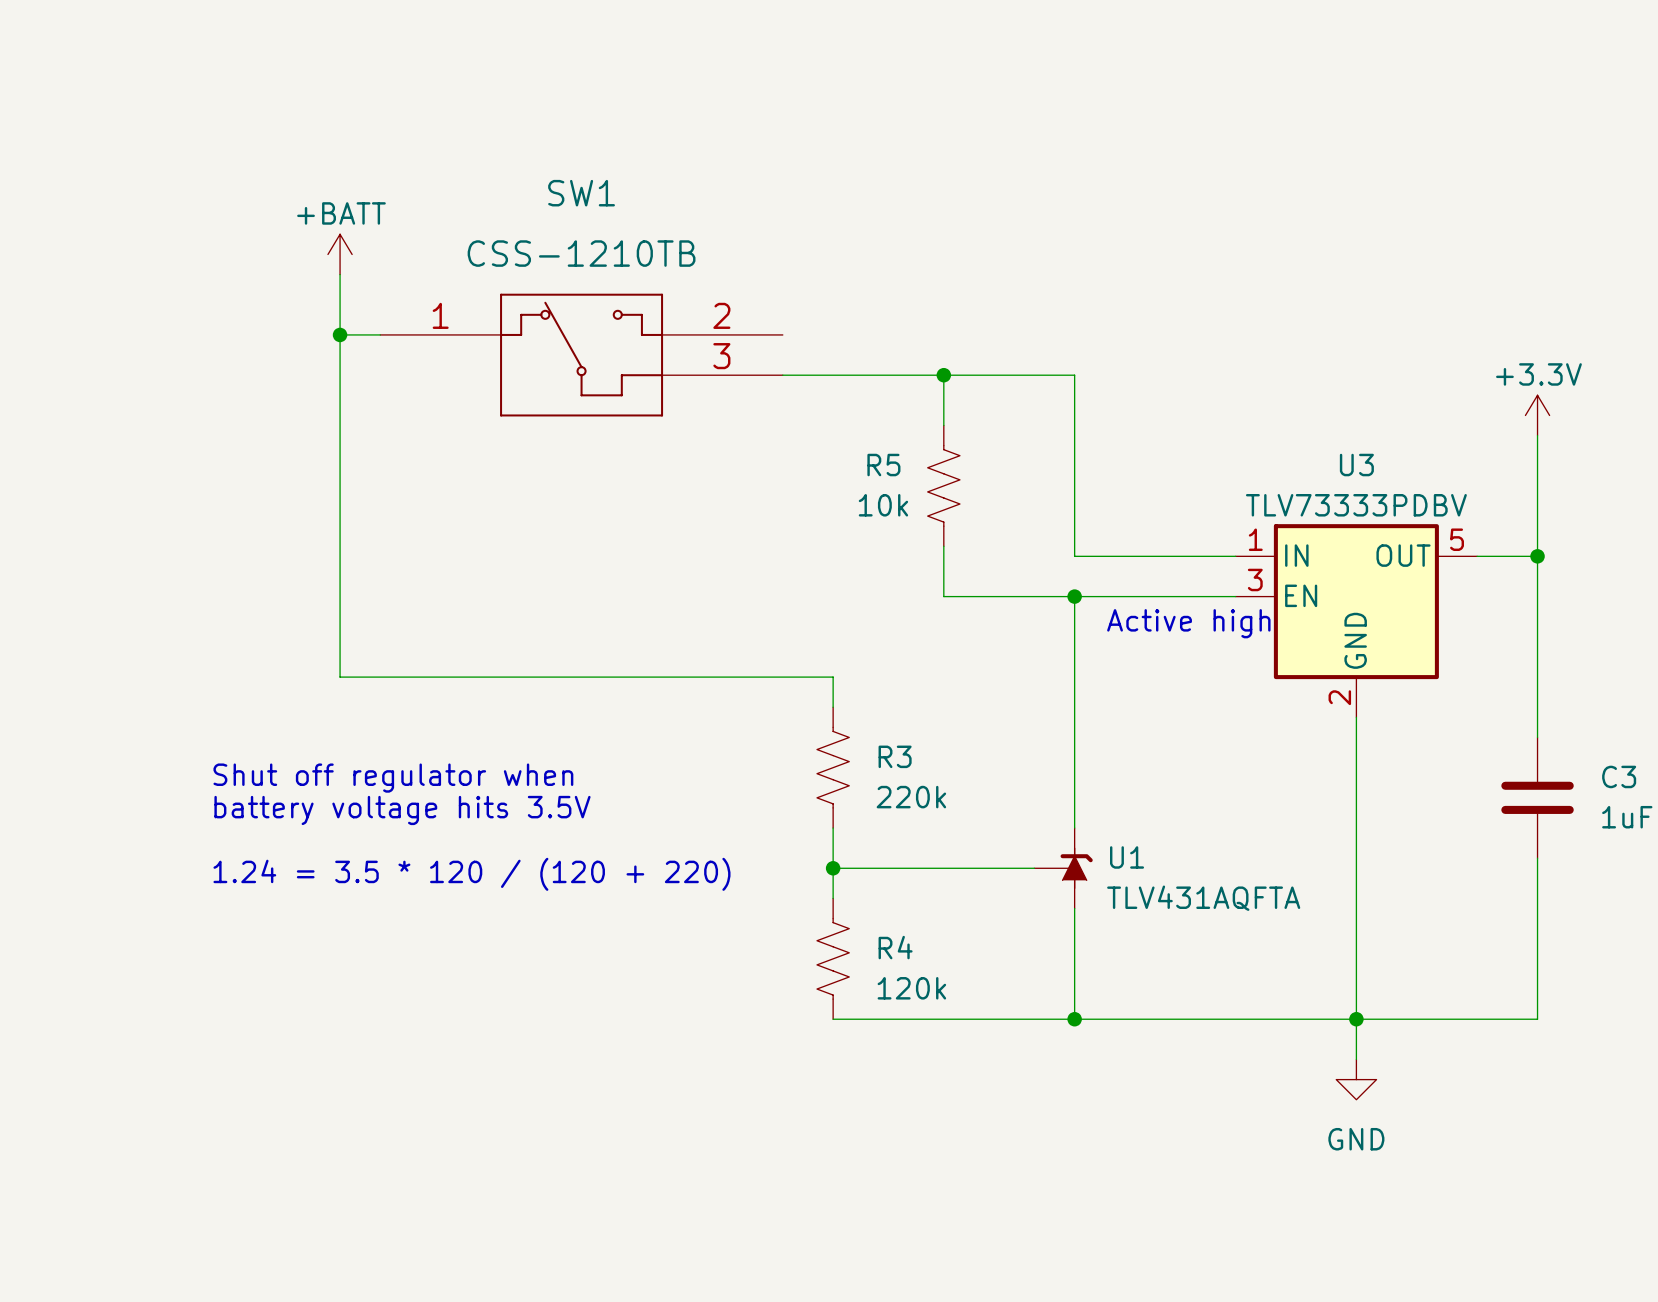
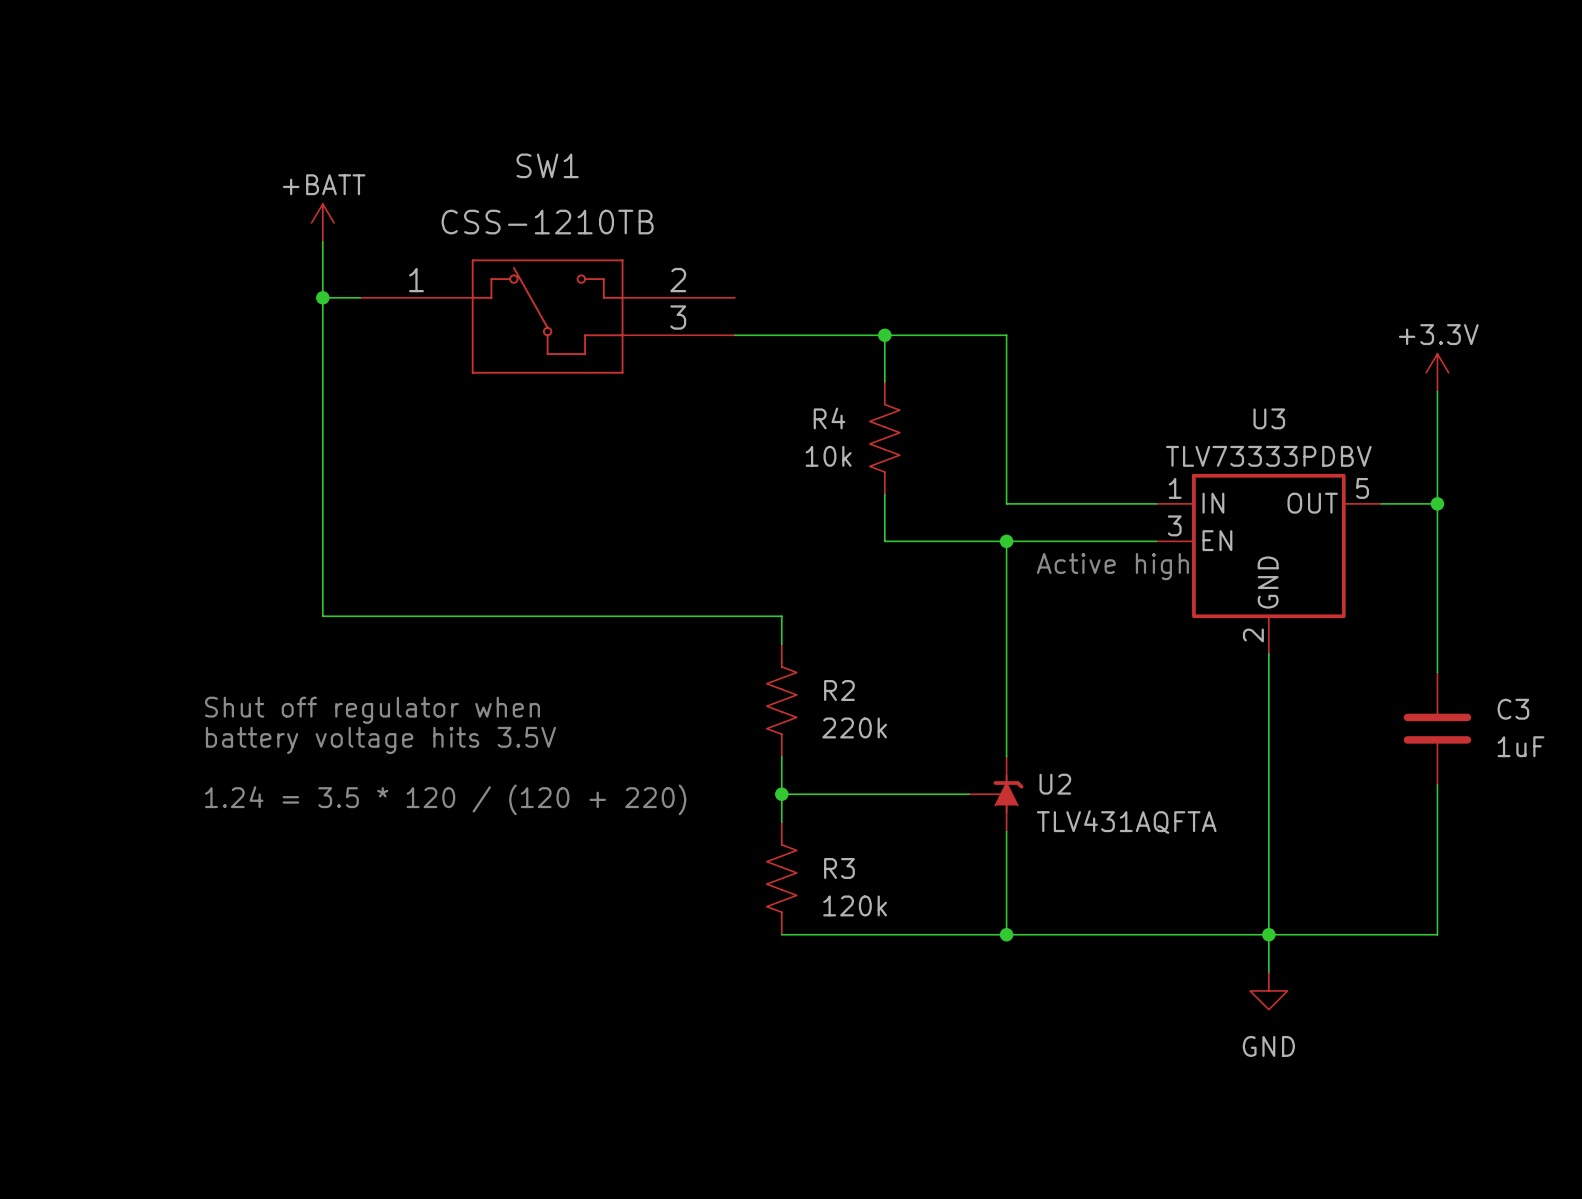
R5 name: R5 (883, 465) -> R4 (829, 418)
R3 name: R3 (895, 756) -> R2 (839, 690)
U1 name: U1 (1127, 857) -> U2 (1055, 784)
R4 name: R4 (895, 947) -> R3 (839, 868)

